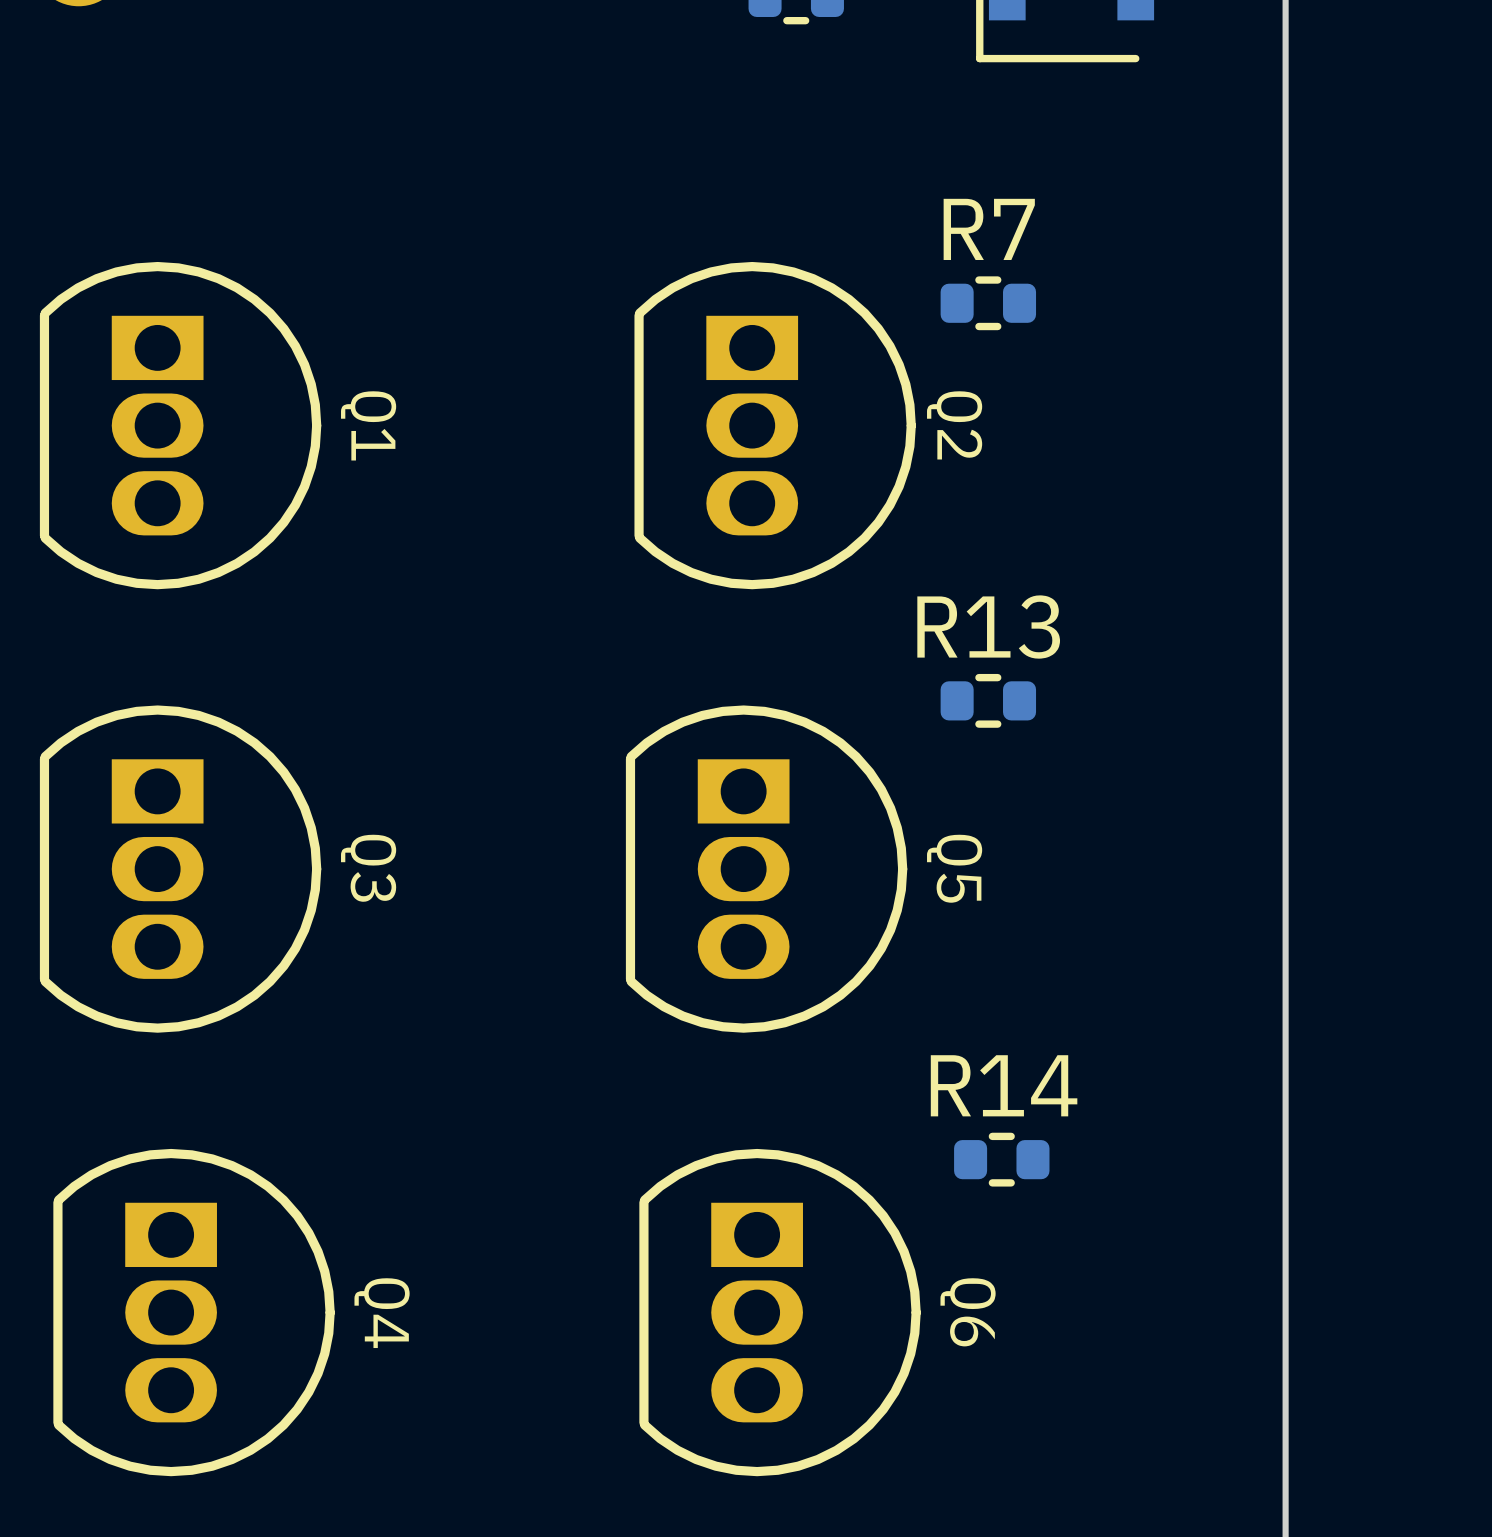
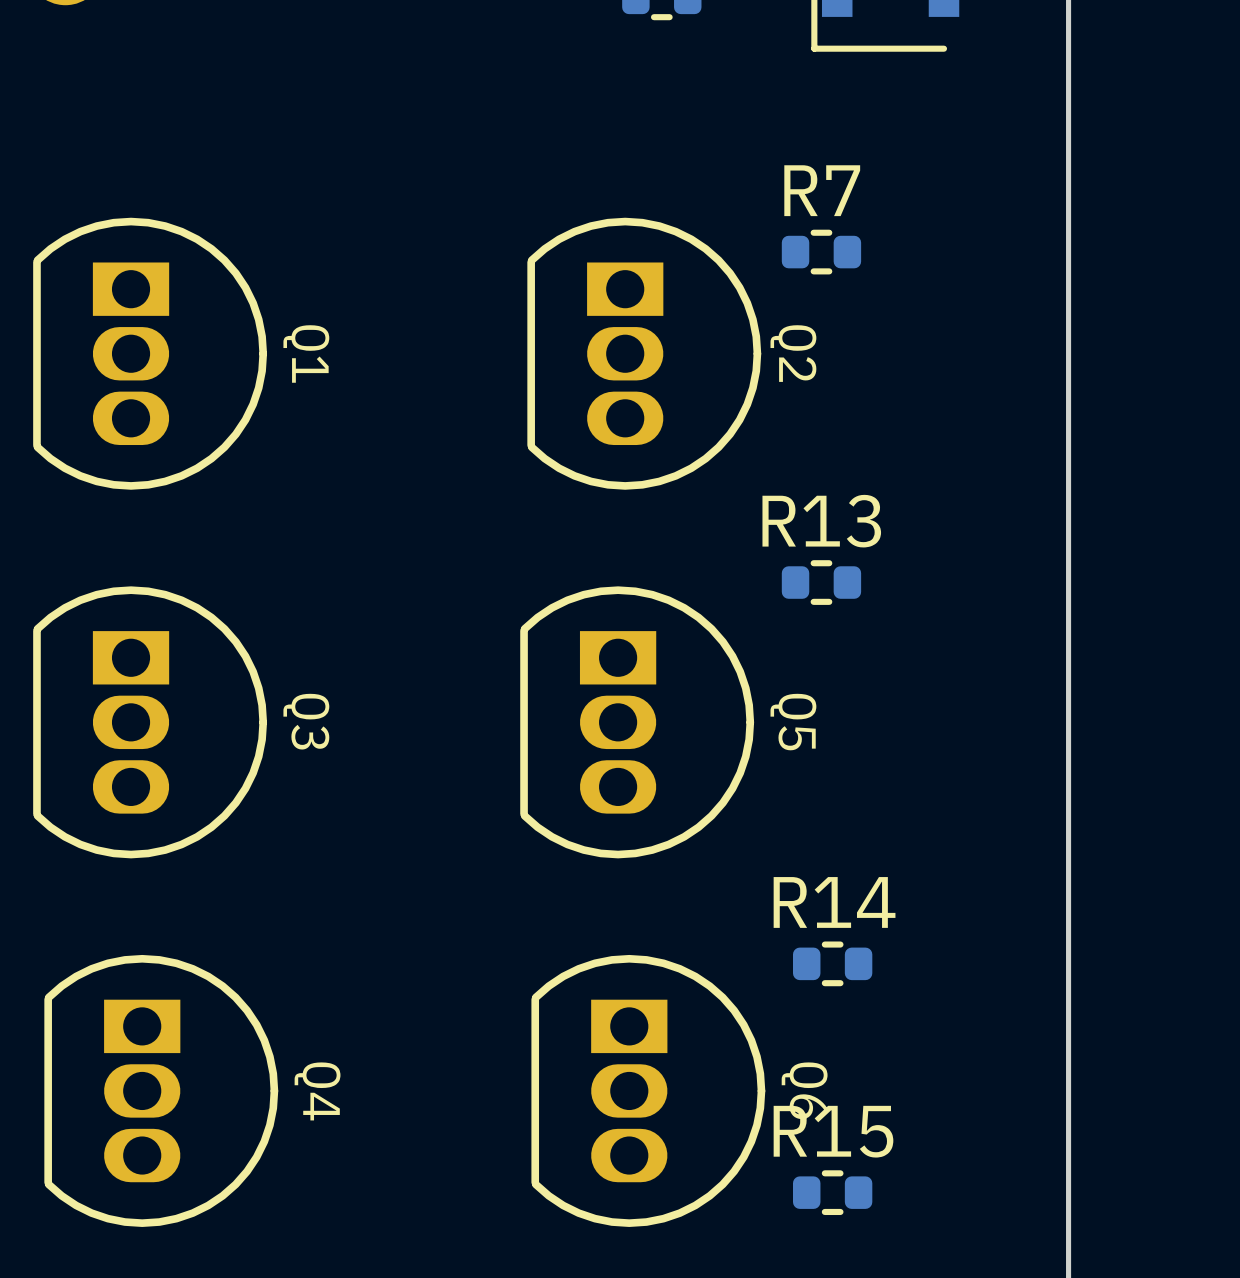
R15: none -> (832, 1192)

